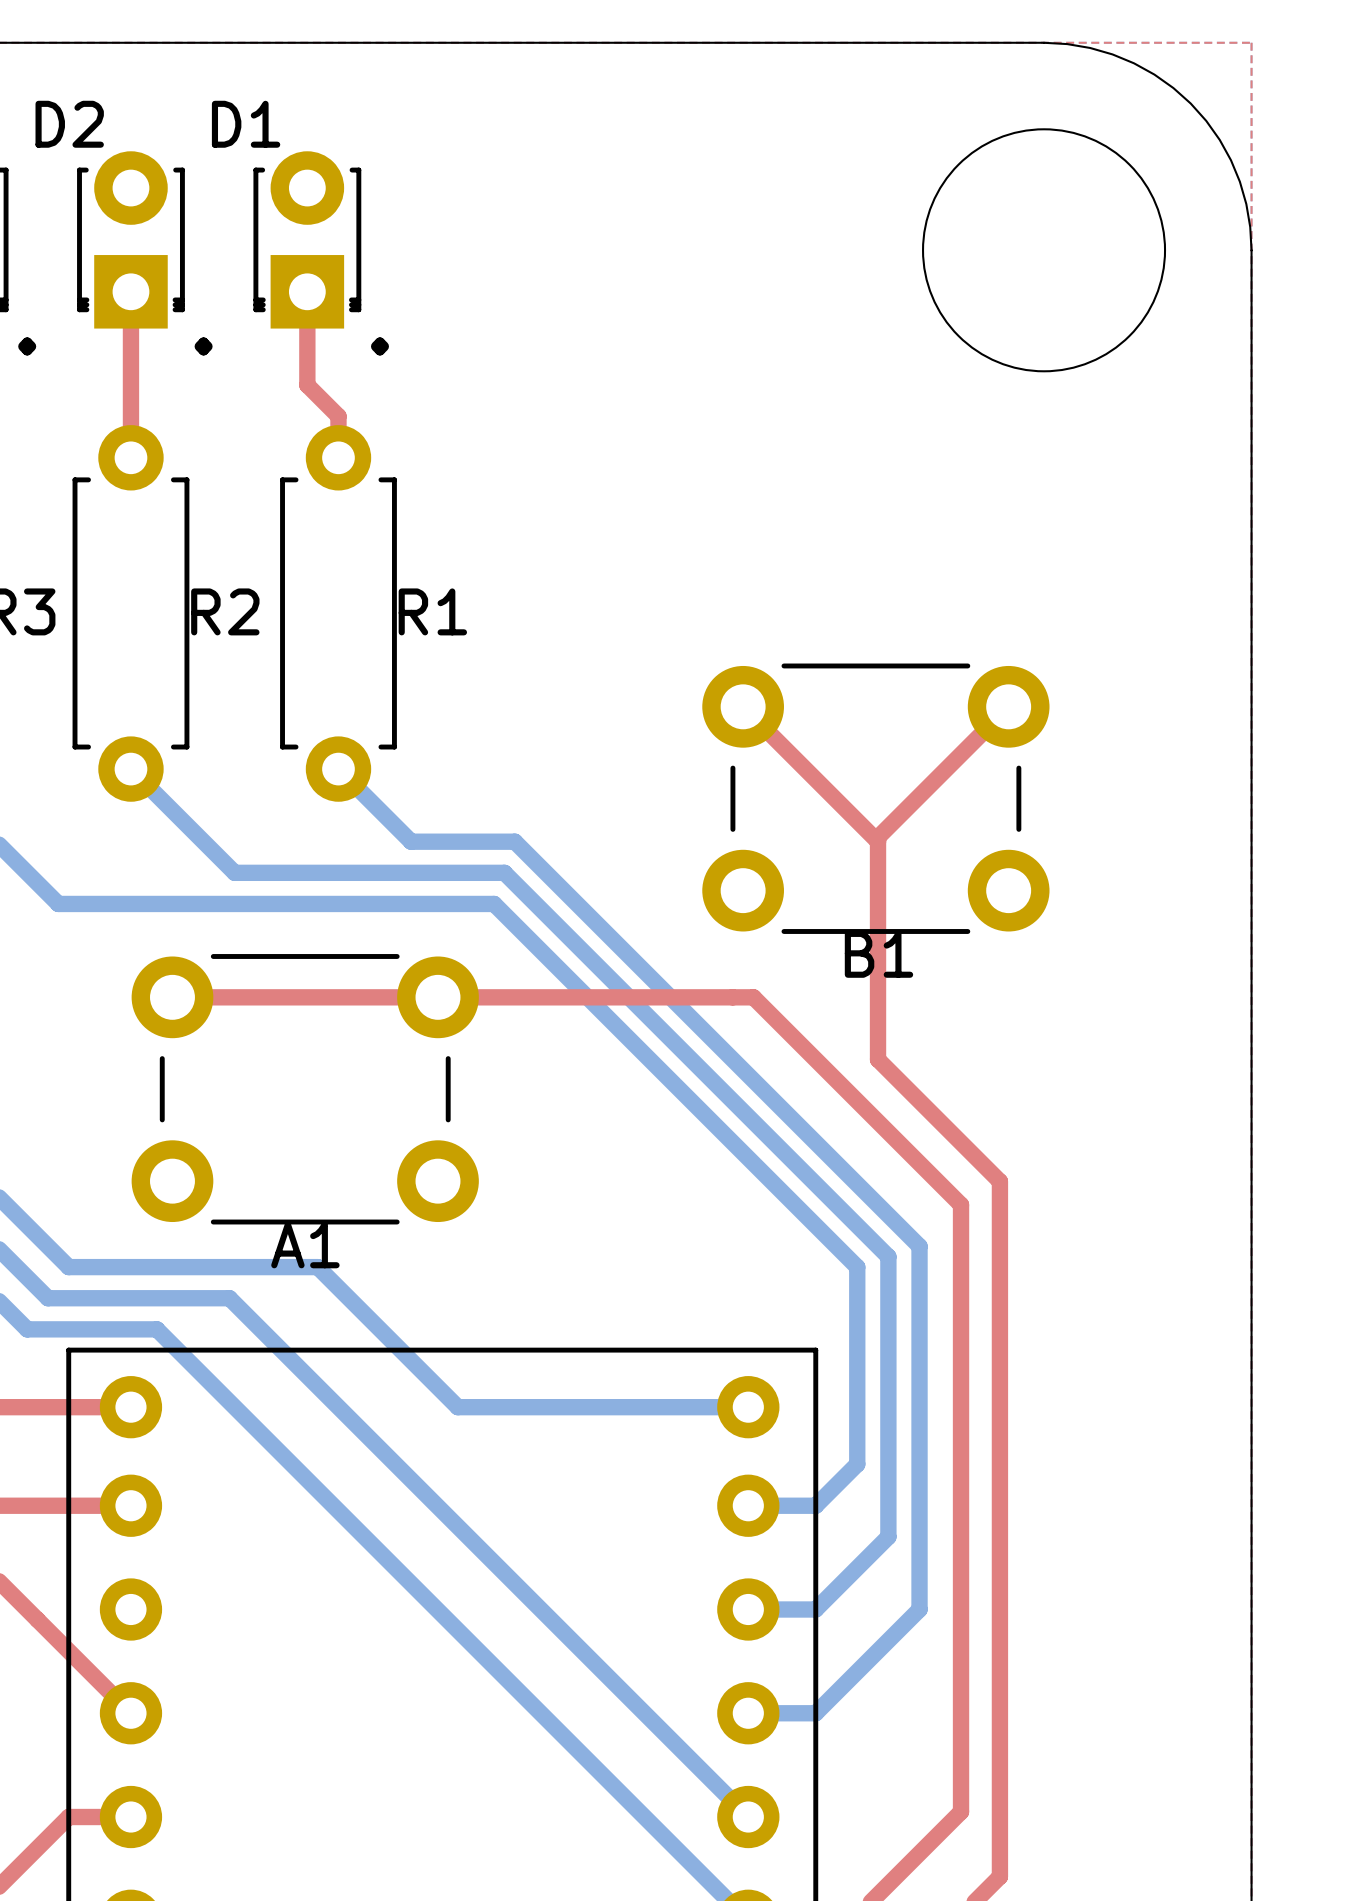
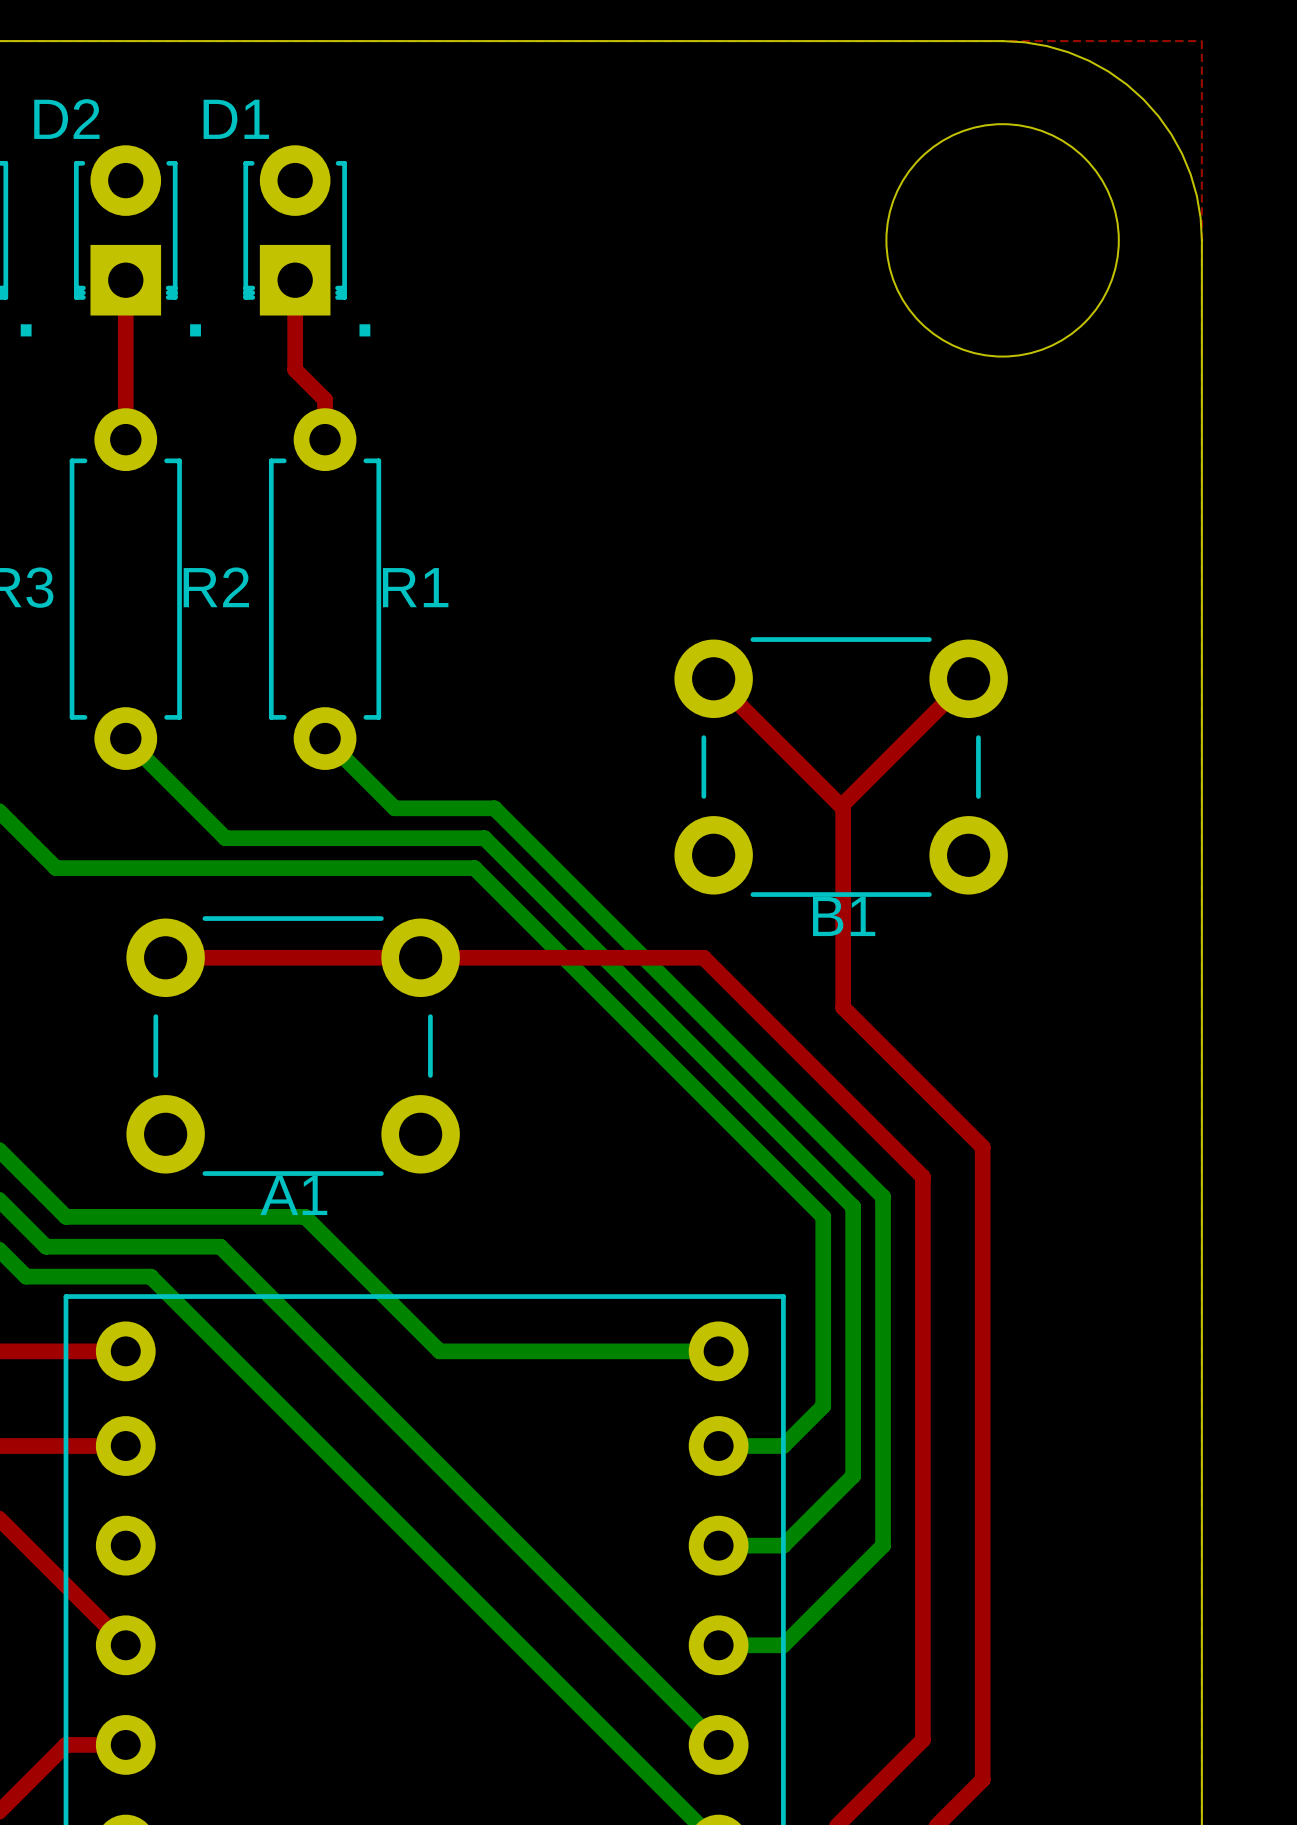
top track: (732, 997) (753, 997) (961, 1204) (961, 1225) -> (703, 957) (922, 1176)
top track: (878, 1049) (878, 1059) (999, 1181) (999, 1876) -> (843, 1007) (982, 1147) (982, 1779) (960, 1802)

